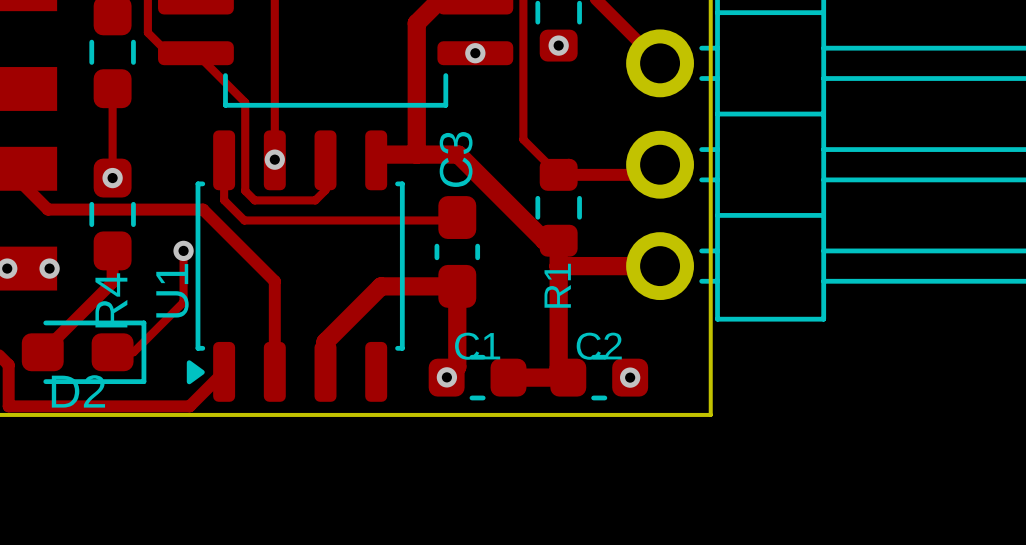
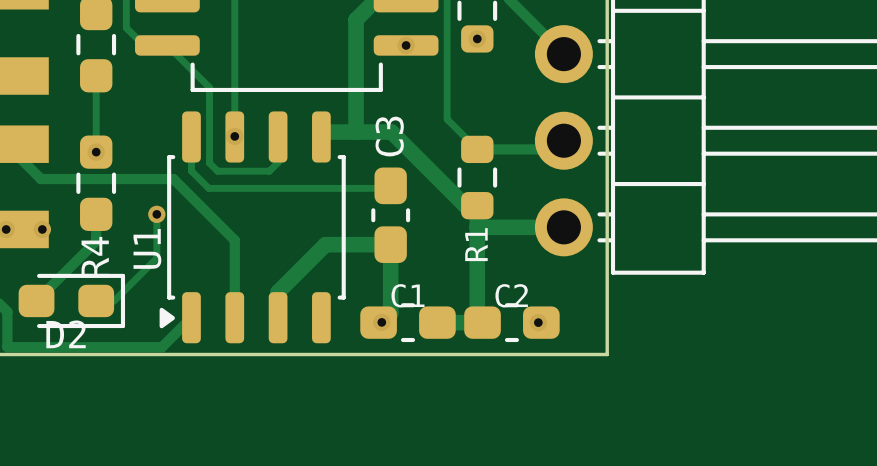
C1 footprint: [428, 354, 527, 401] -> [360, 303, 456, 343]
C2 footprint: [550, 354, 649, 401] -> [464, 303, 560, 343]

